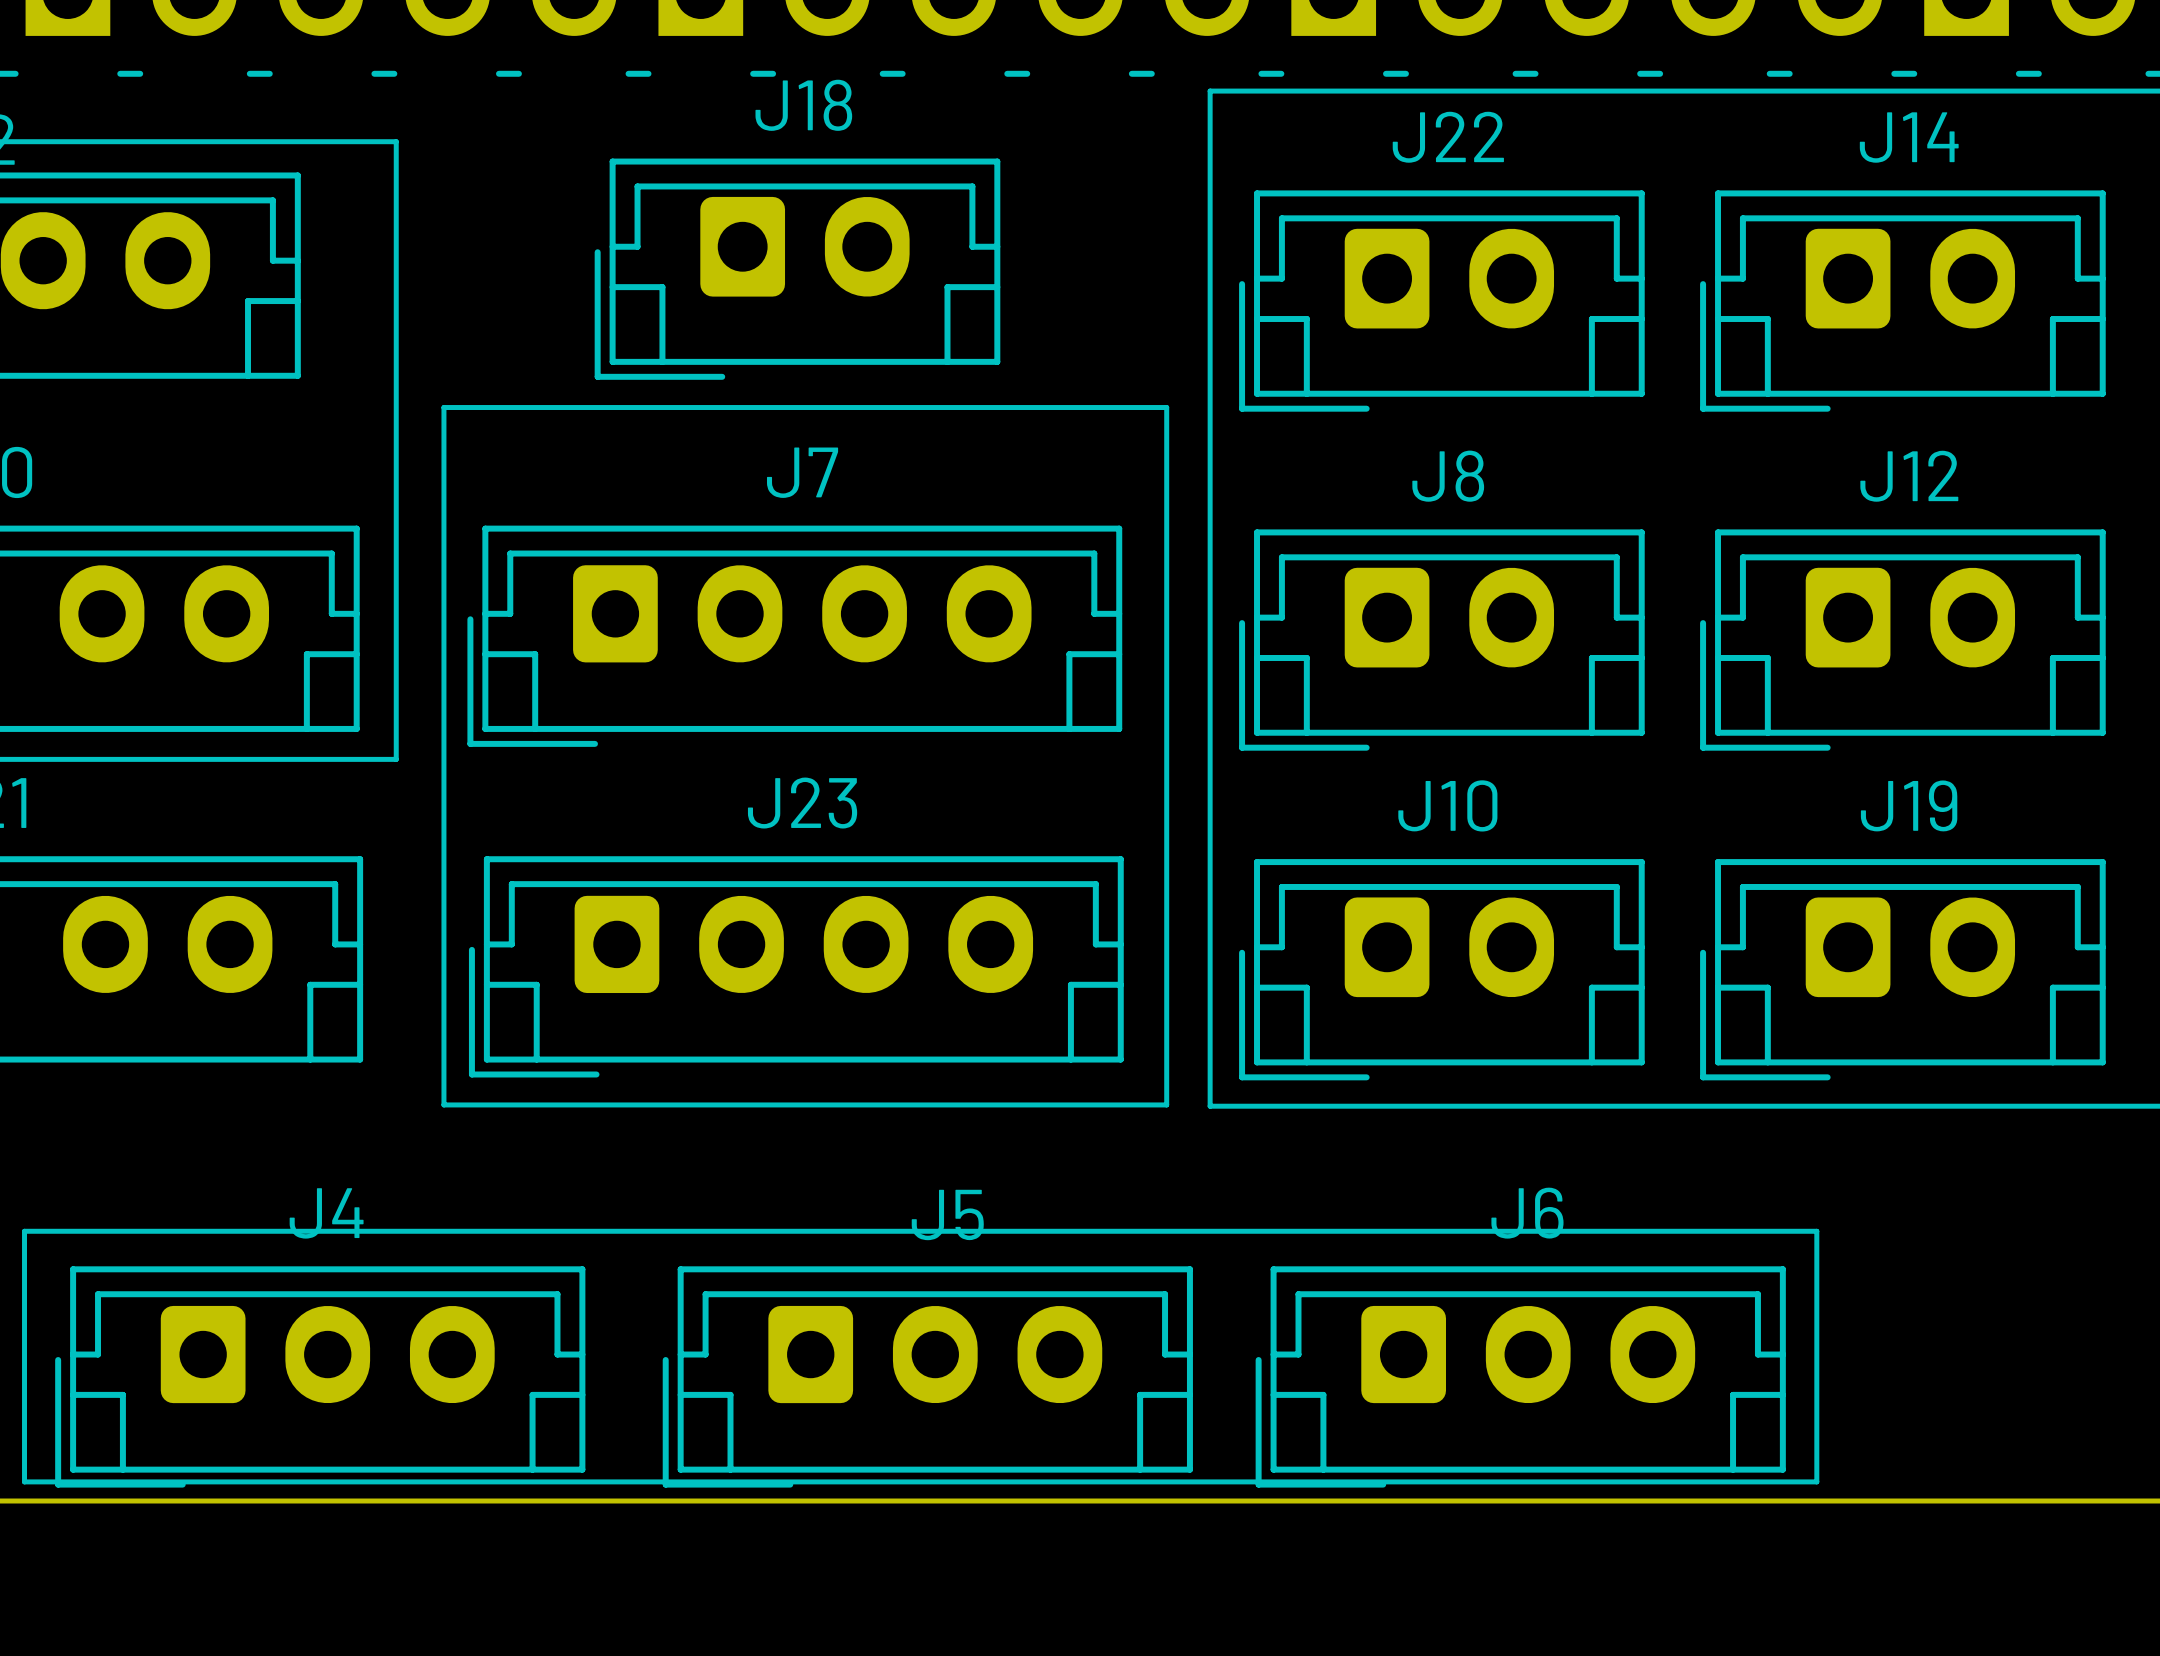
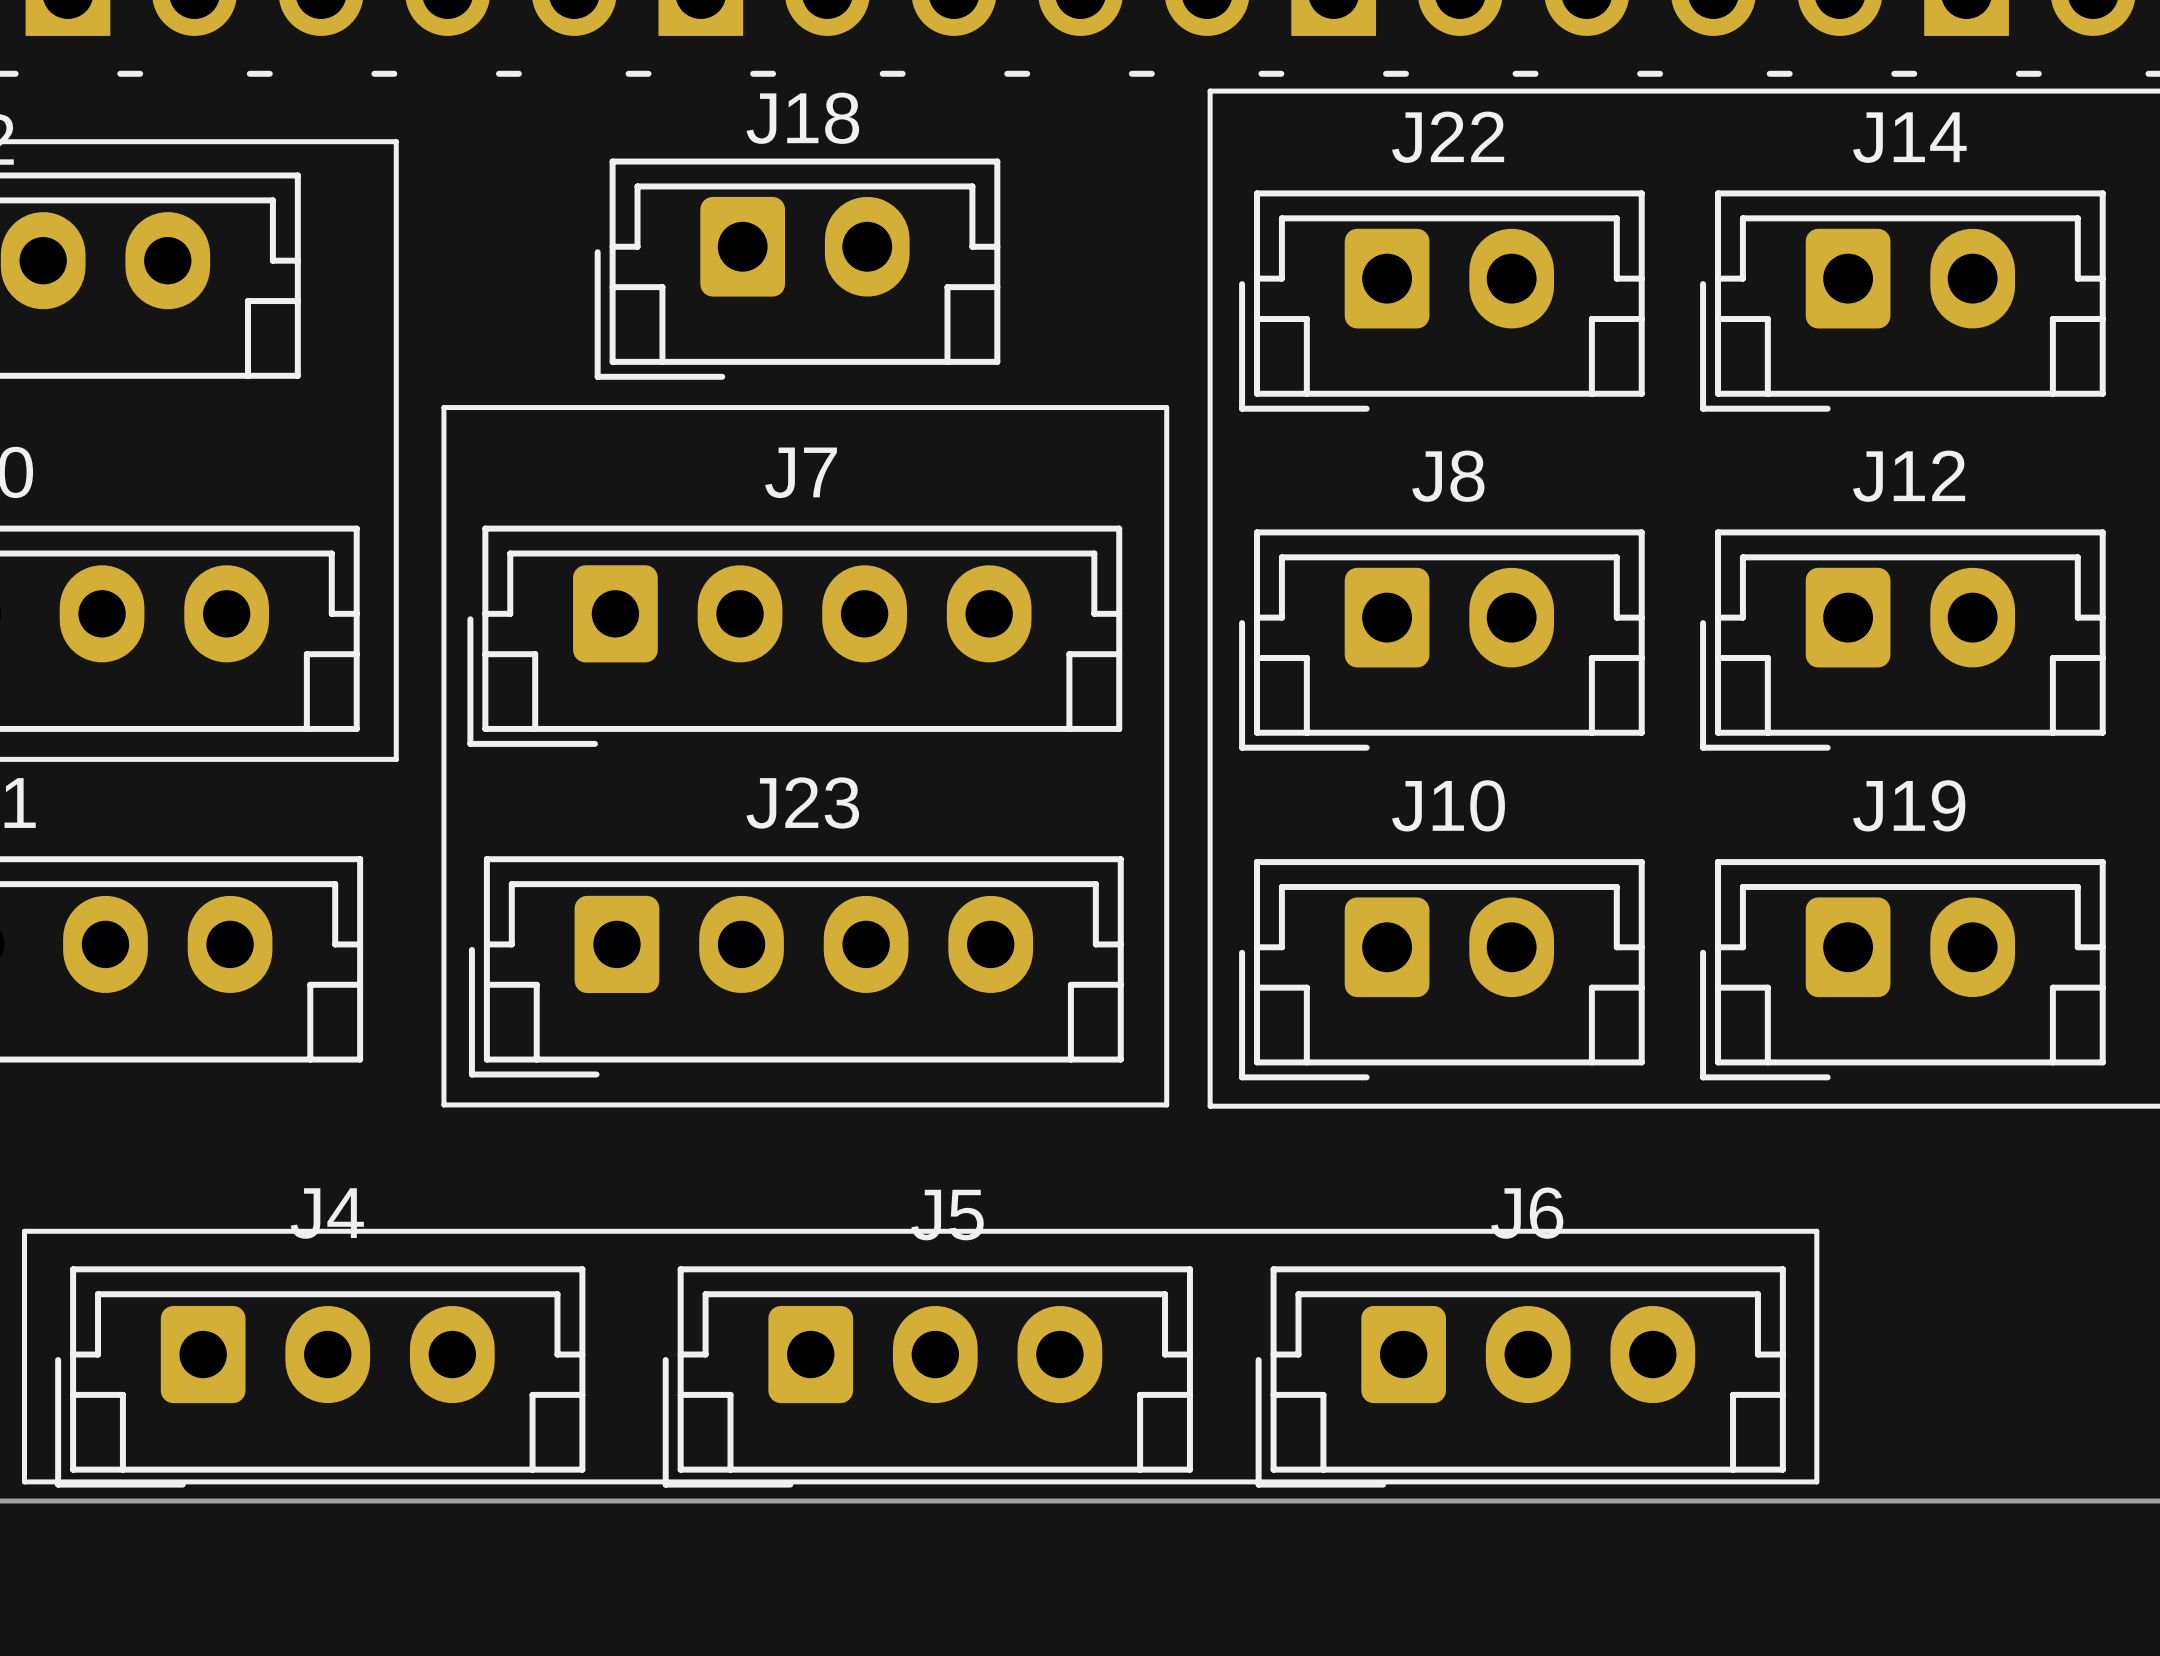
J18 name position: J18 (803, 105) -> J18 (802, 118)

